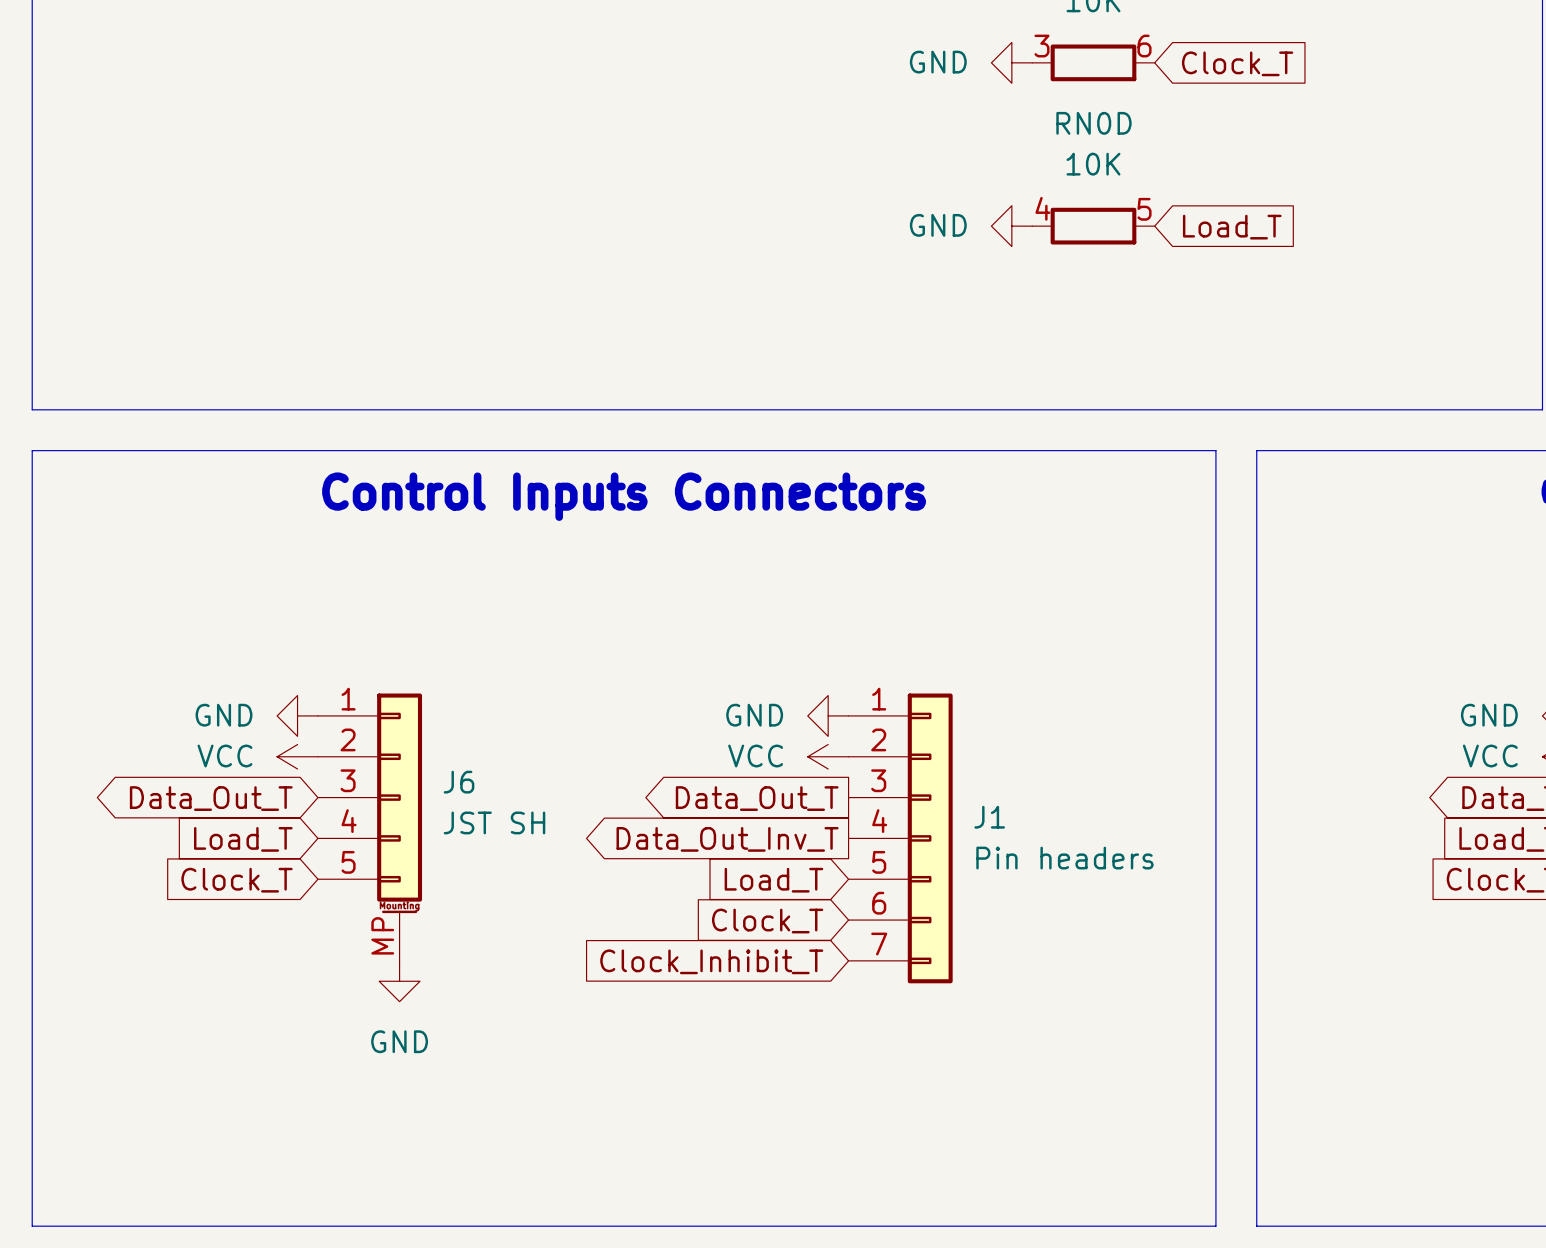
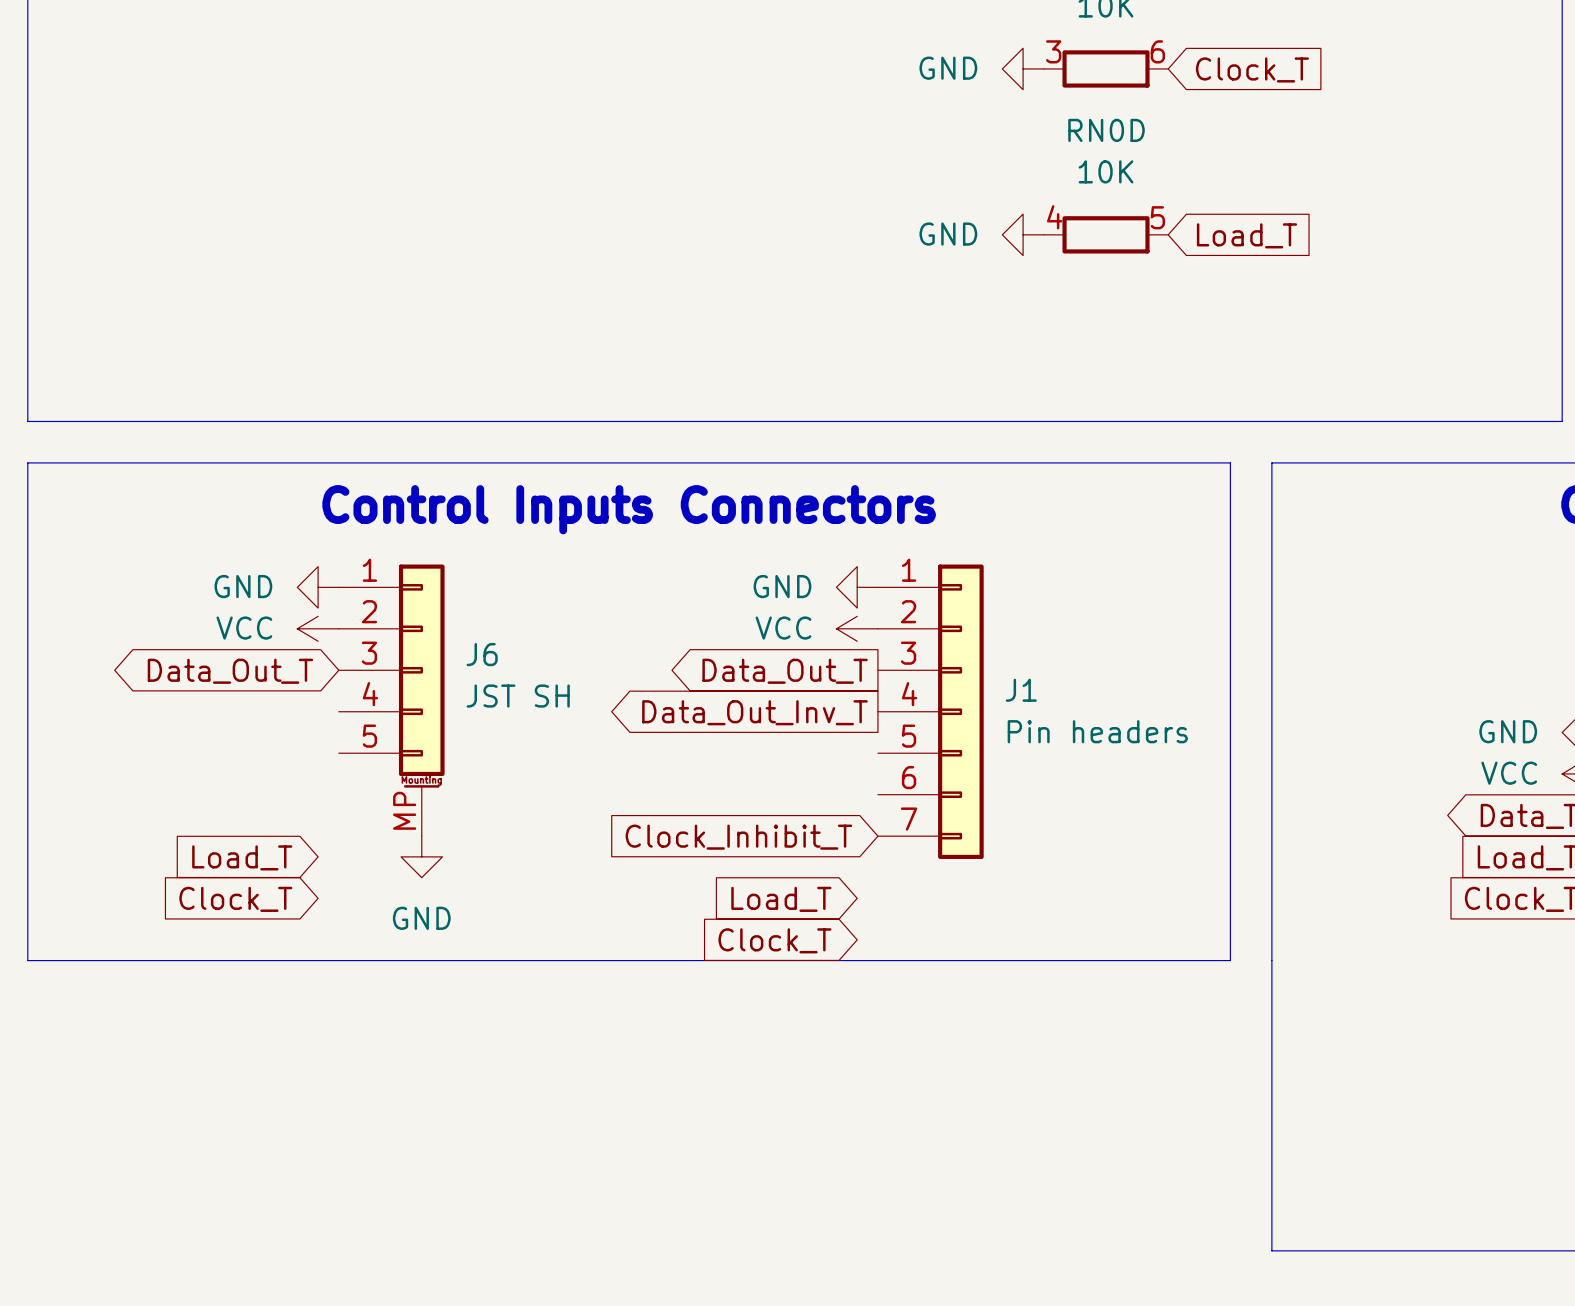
power symbol: none -> GND (318, 587)
power symbol: GND (297, 715) -> none
power symbol position: GND (828, 715) -> GND (857, 587)
power symbol position: VCC (297, 756) -> VCC (318, 628)
power symbol position: VCC (828, 756) -> VCC (857, 628)
global label position: Data_Out_T (211, 798) -> Data_Out_T (230, 671)
global label position: Data_Out_T (757, 798) -> Data_Out_T (785, 671)
J6 position: (369, 827) -> (391, 700)
power symbol: none -> GND (421, 856)
J1 position: (900, 838) -> (930, 711)
global label position: Data_Out_Inv_T (727, 839) -> Data_Out_Inv_T (754, 712)
line: (32, 940) (32, 1226) (1215, 1226) (1215, 940) -> (27, 960) (1230, 960)
global label position: Clock_Inhibit_T (711, 961) -> Clock_Inhibit_T (738, 837)
power symbol: GND (399, 981) -> none

